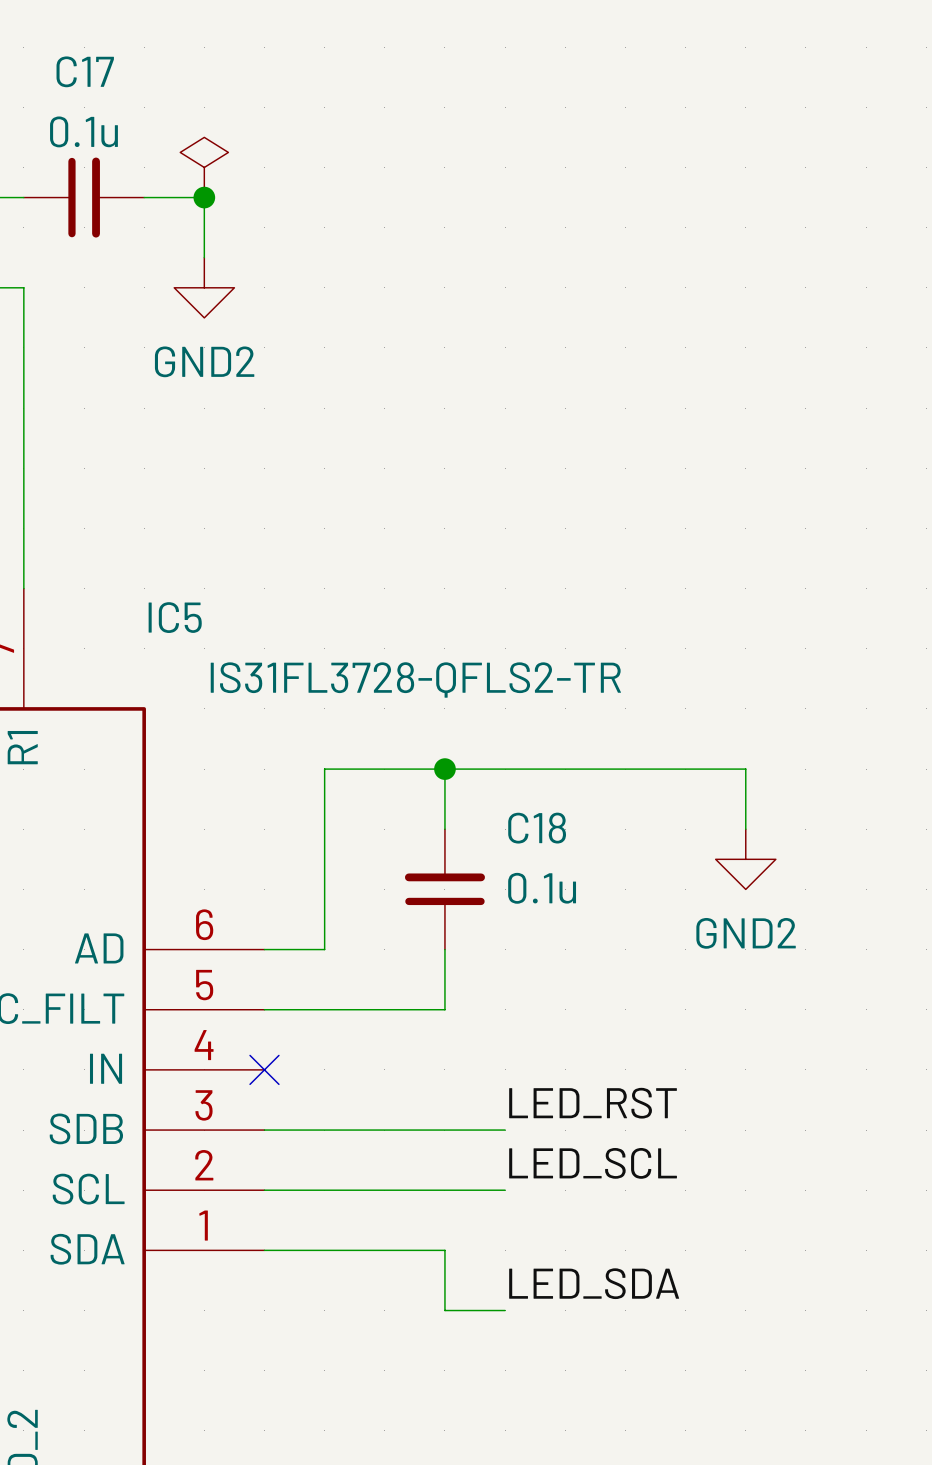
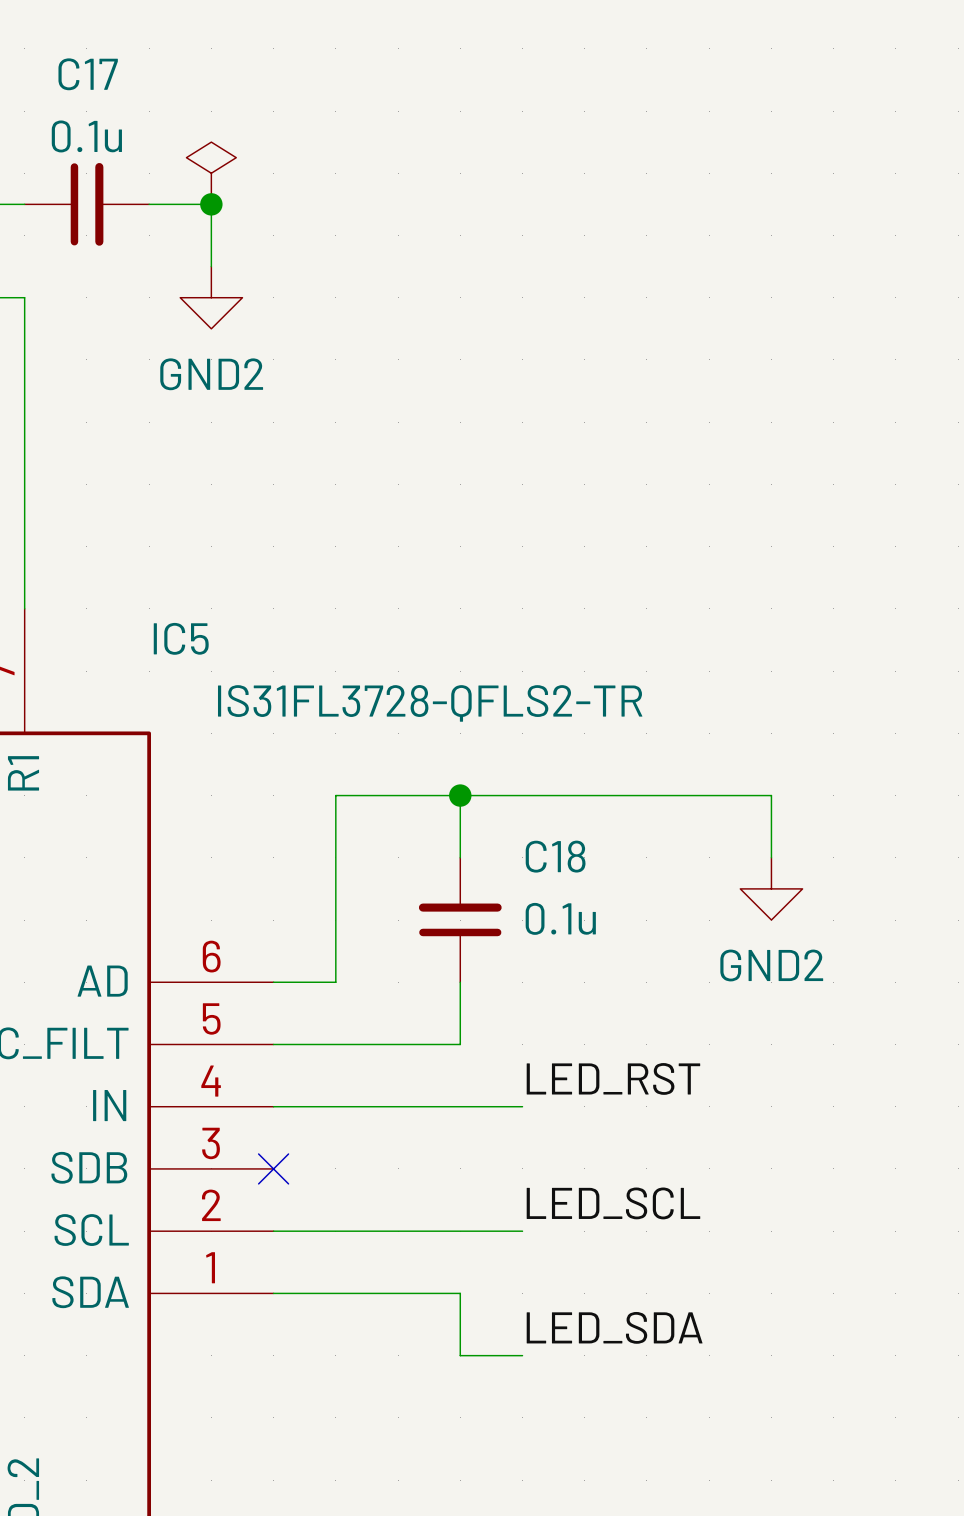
no-connect mark position: (264, 1069) -> (273, 1168)
label position: LED_RST (593, 1103) -> LED_RST (613, 1078)
wire: (264, 1130) (505, 1130) -> (273, 1106) (522, 1106)

